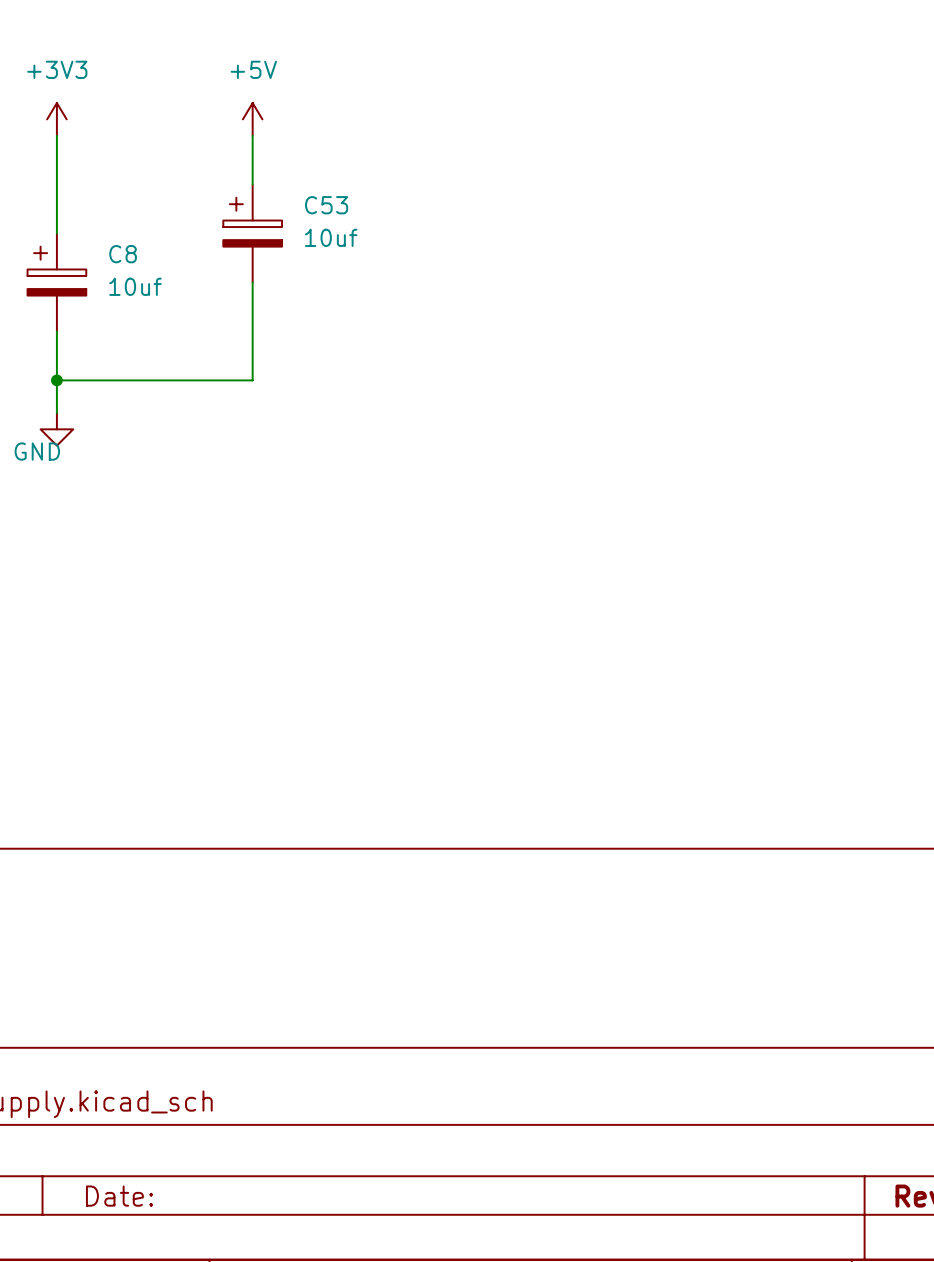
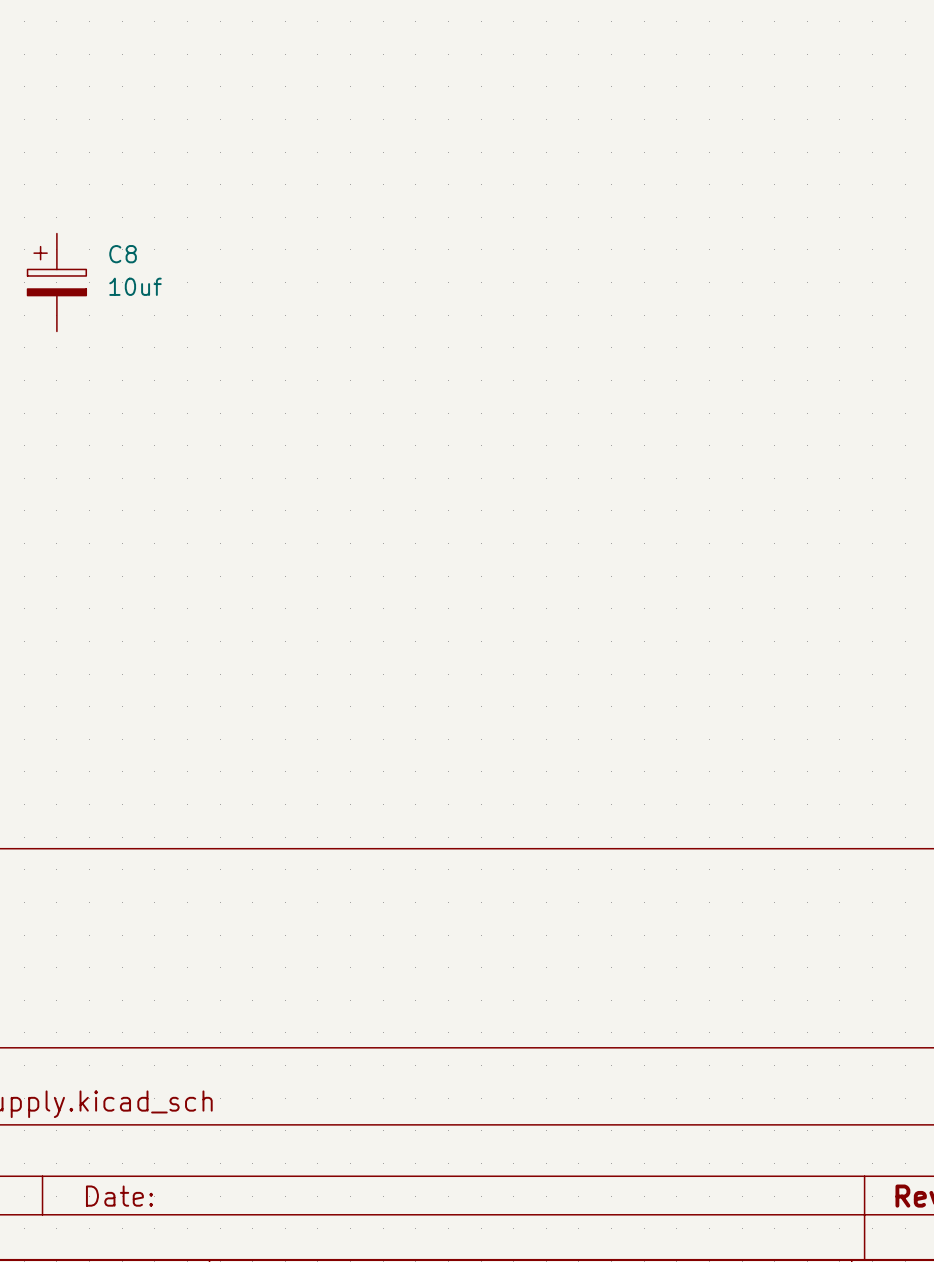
power symbol: +3V3 (56, 119) -> none
power symbol: +5V (252, 119) -> none
wire: (56, 135) (56, 233) -> none
wire: (252, 135) (252, 184) -> none
C53: 10uf (252, 233) -> none
wire: (252, 282) (252, 380) (56, 380) -> none
wire: (56, 331) (56, 413) -> none
junction: (56, 380) -> none
power symbol: GND (56, 429) -> none

